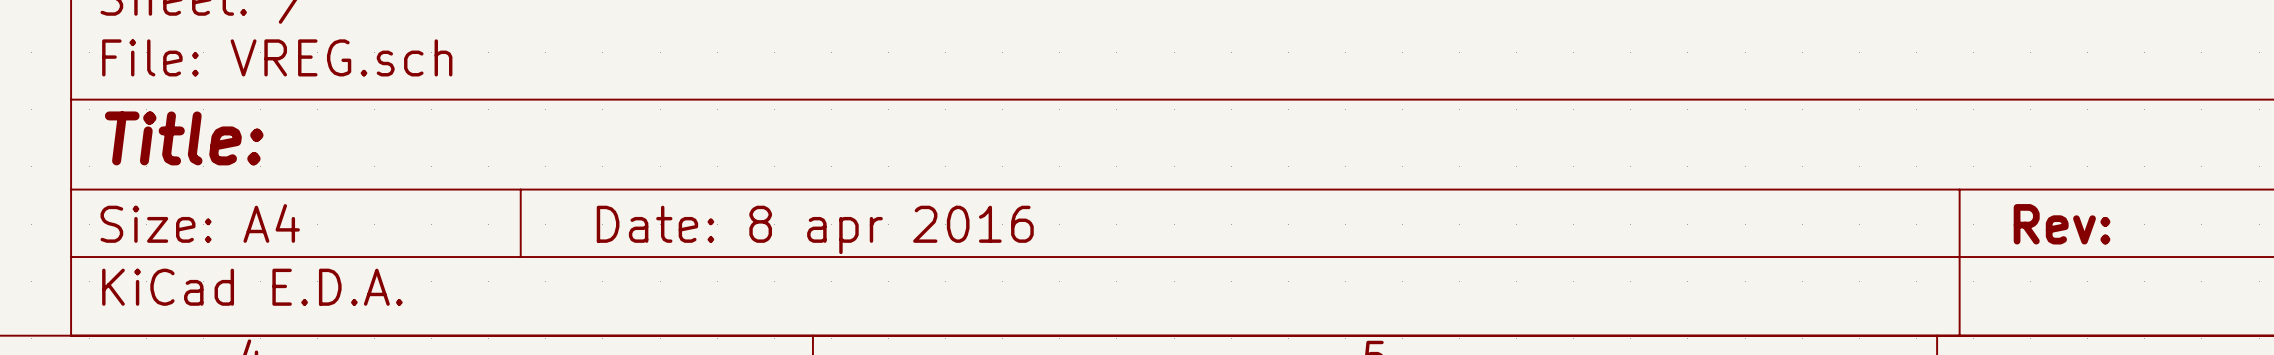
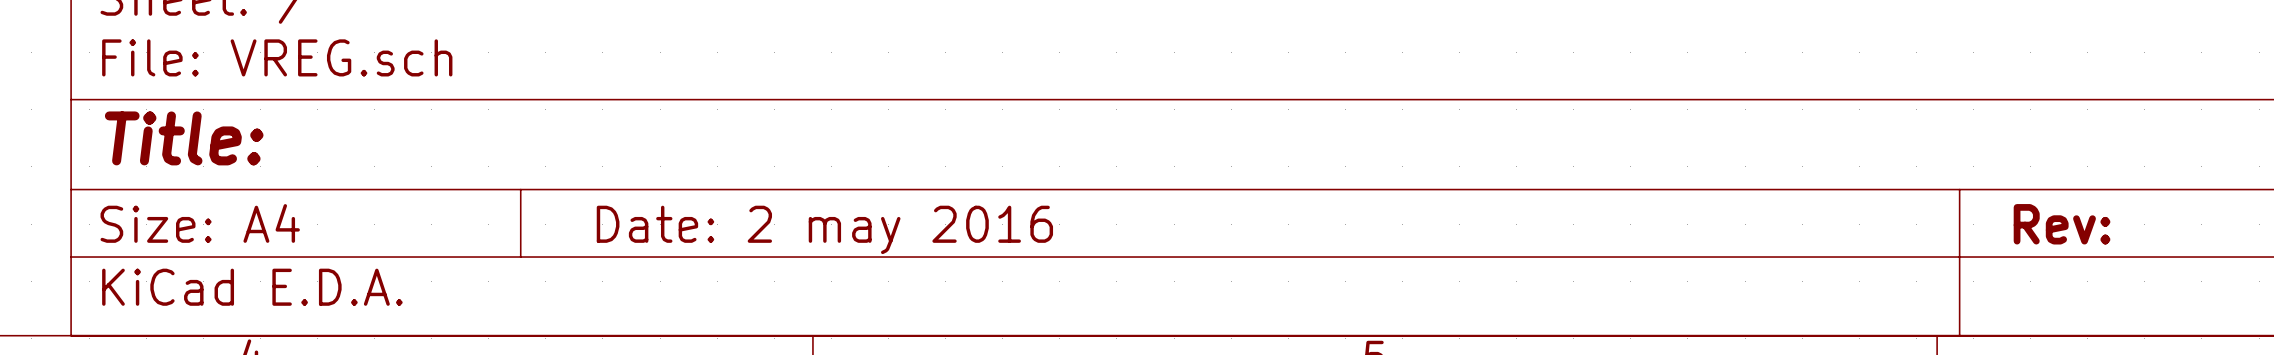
title block: Date: 8 apr 2016 (815, 229) -> Date: 2 may 2016 (824, 229)

